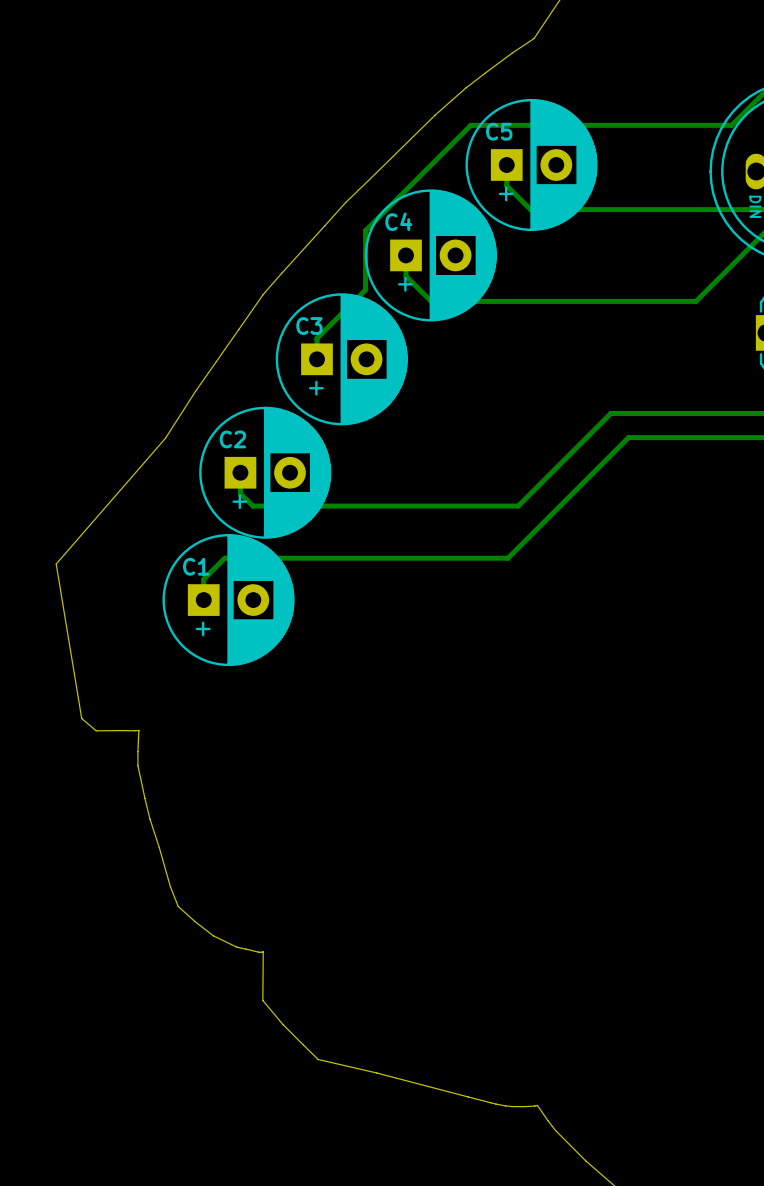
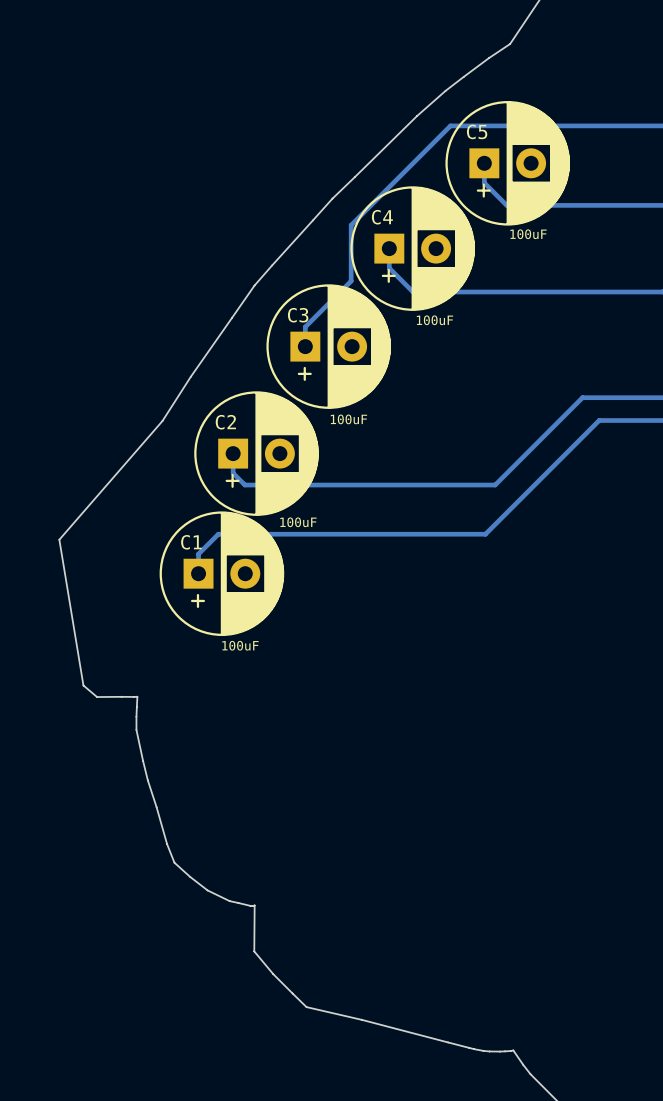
C5 value: none -> 100uF (528, 234)
C4 value: none -> 100uF (434, 320)
C3 value: none -> 100uF (348, 419)
C2 value: none -> 100uF (298, 522)
C1 value: none -> 100uF (240, 645)

